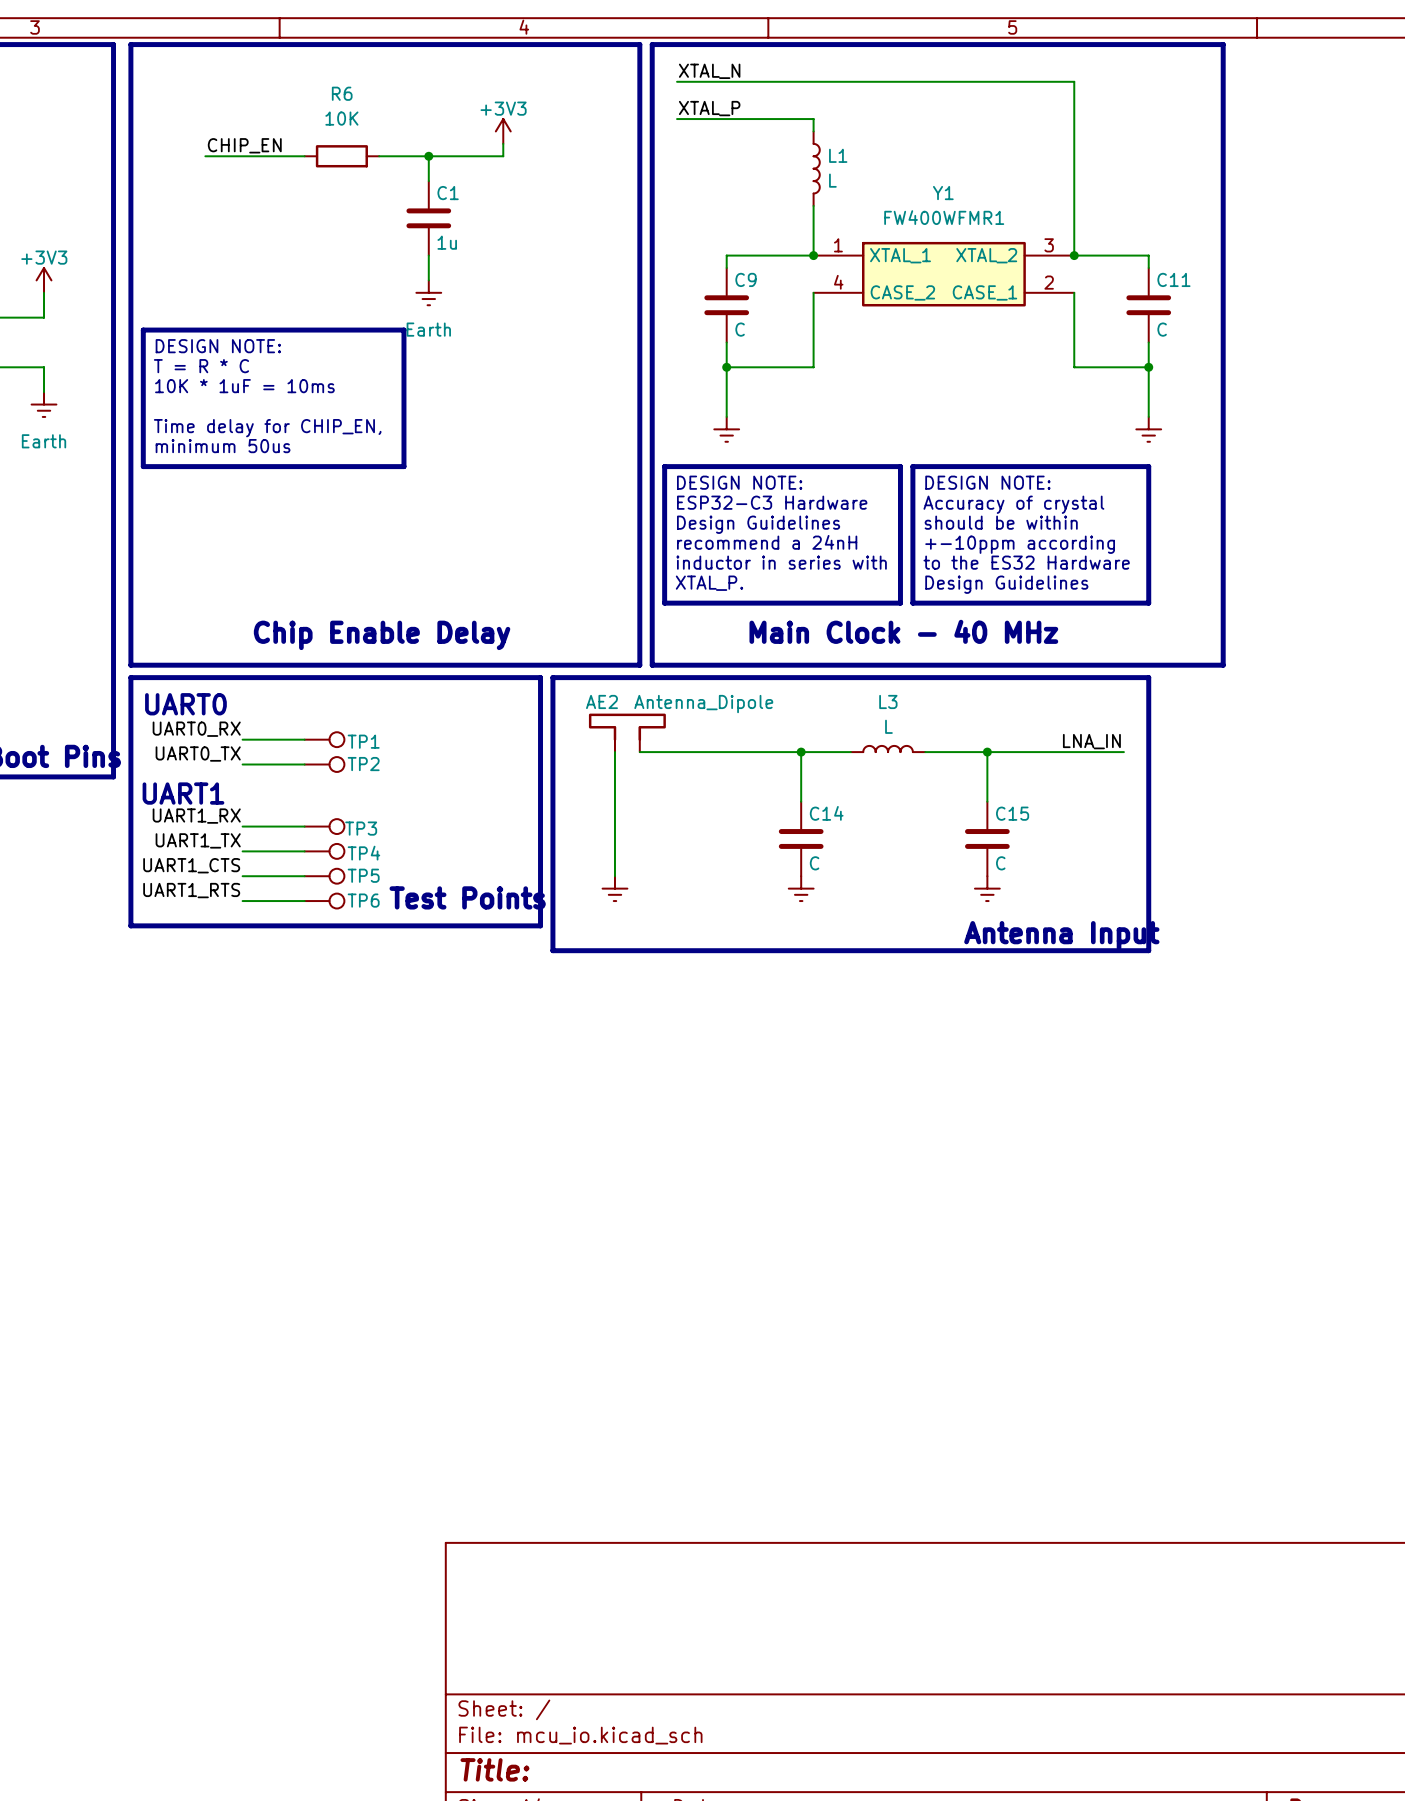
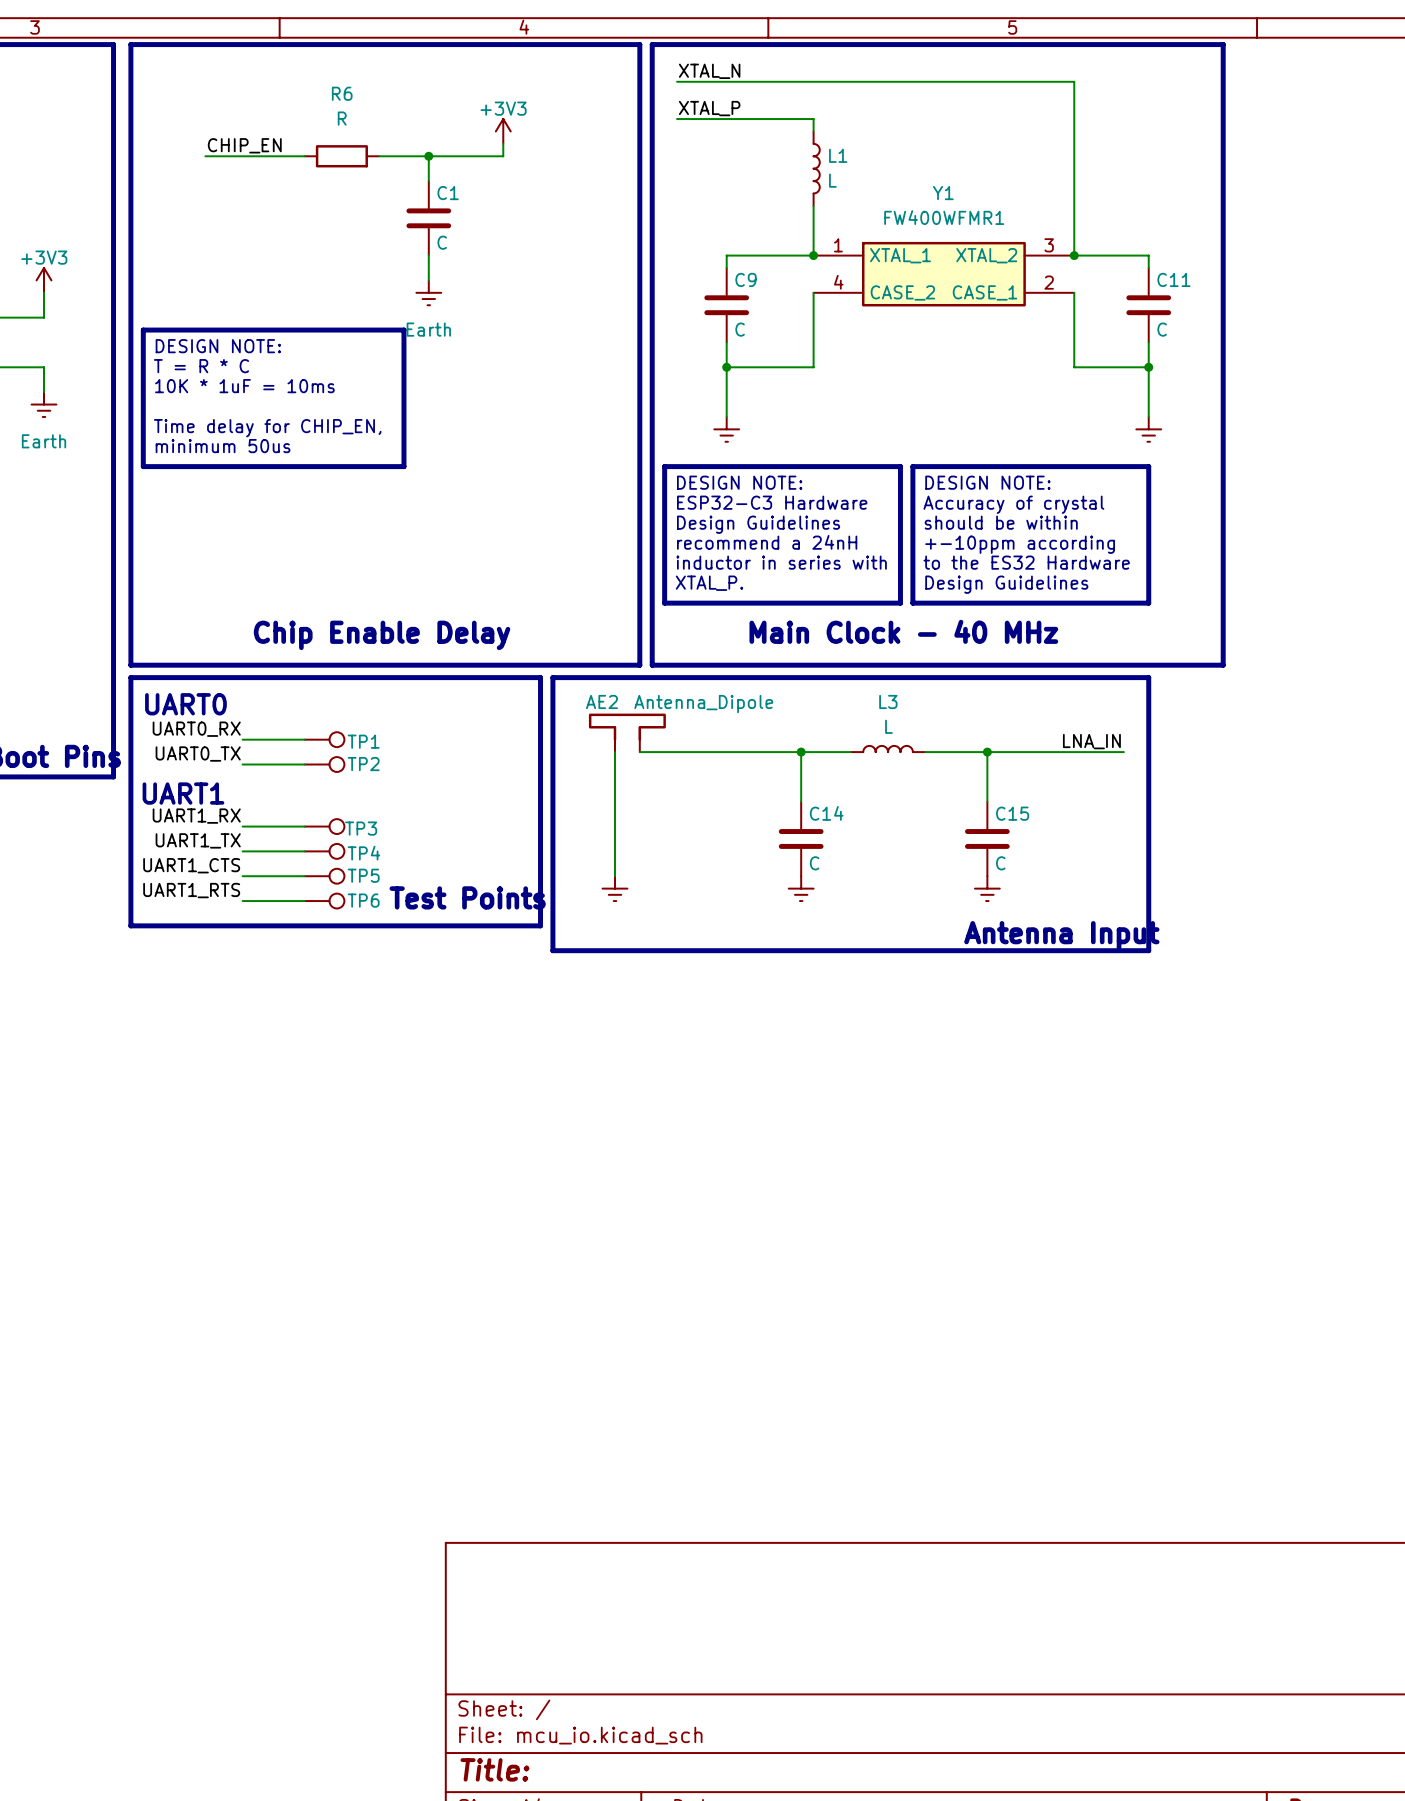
R6 value: 10K (341, 118) -> R (342, 118)
C1 value: 1u (447, 242) -> C (442, 242)

